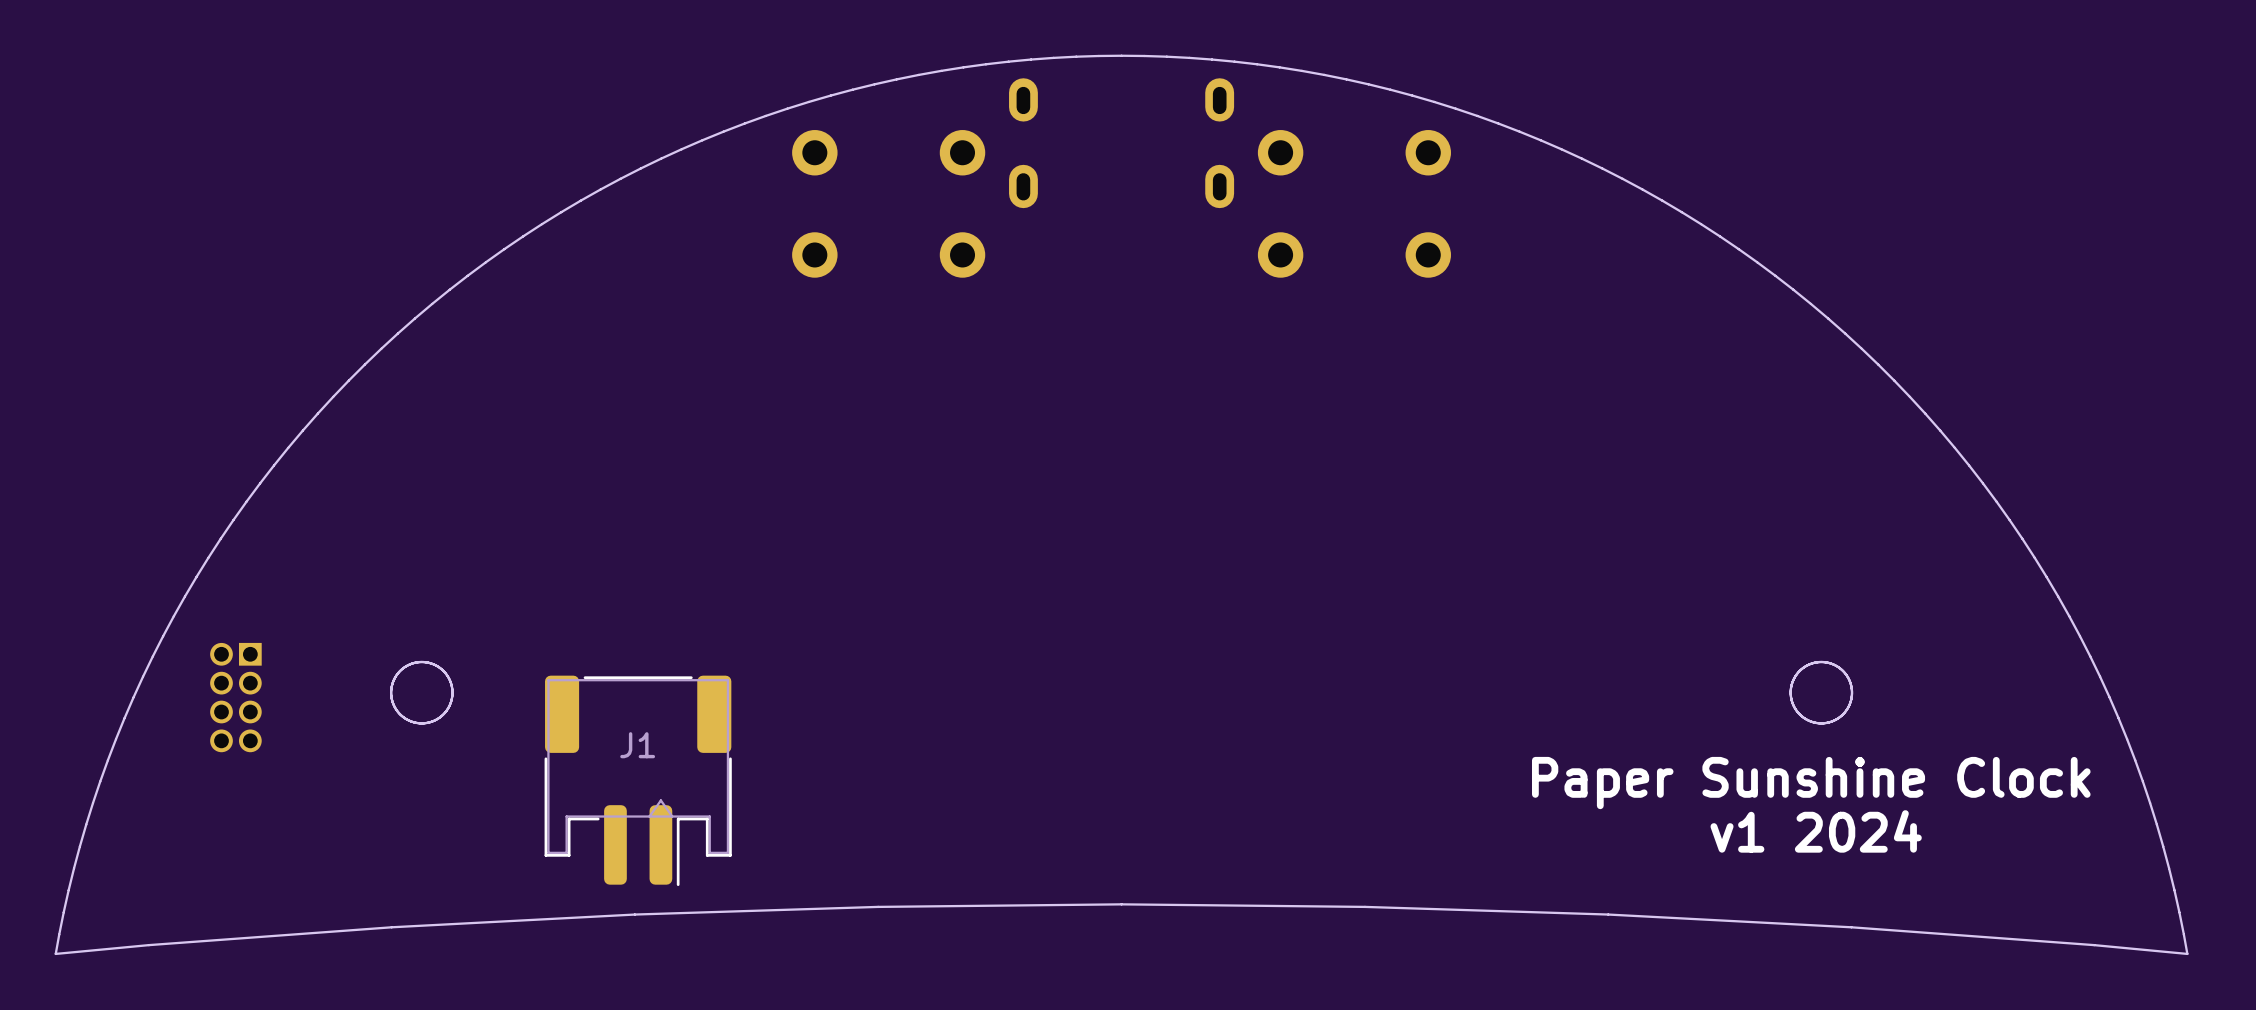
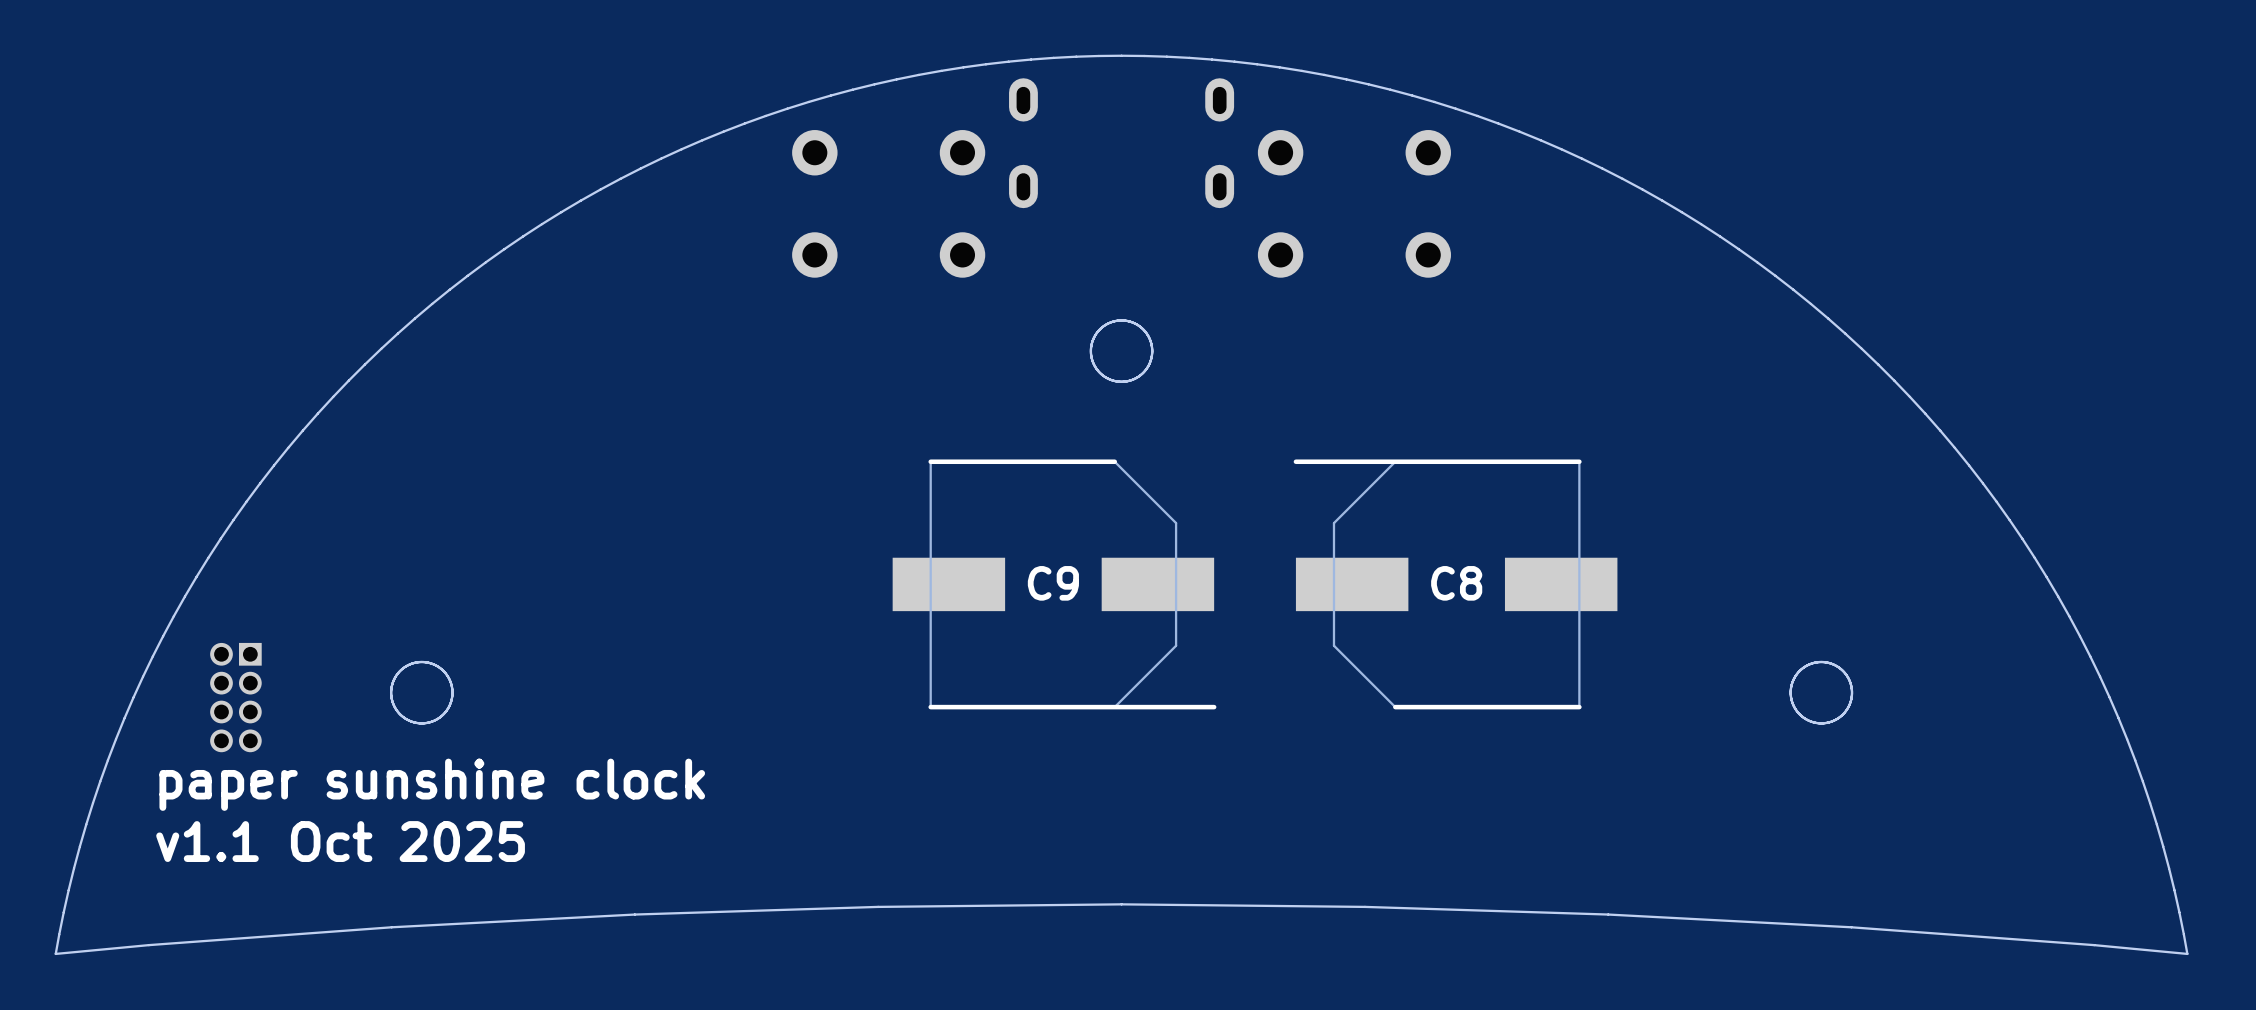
drawing shape: [54, 54, 2189, 956] -> [54, 54, 2189, 956]
C9: none -> (1054, 584)
C8: none -> (1455, 584)
J1: (638, 780) -> none
text: Paper Sunshine Clock (1811, 783) -> none
text: none -> paper sunshine clock (432, 784)
text: v1 2024 (1816, 831) -> none
text: none -> v1.1 Oct 2025 (340, 841)

